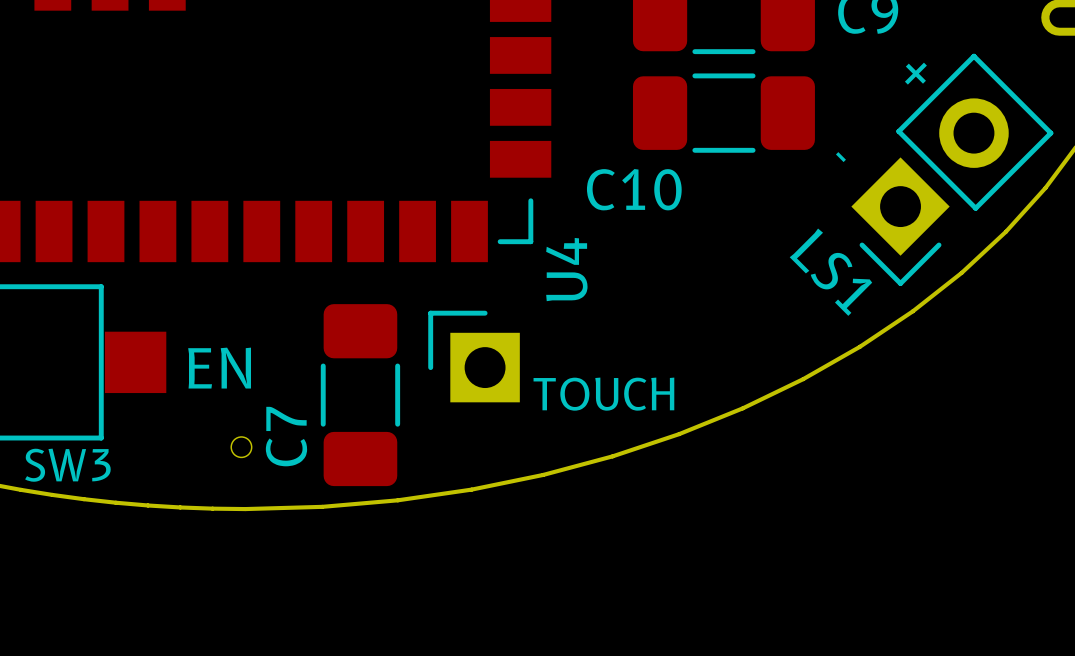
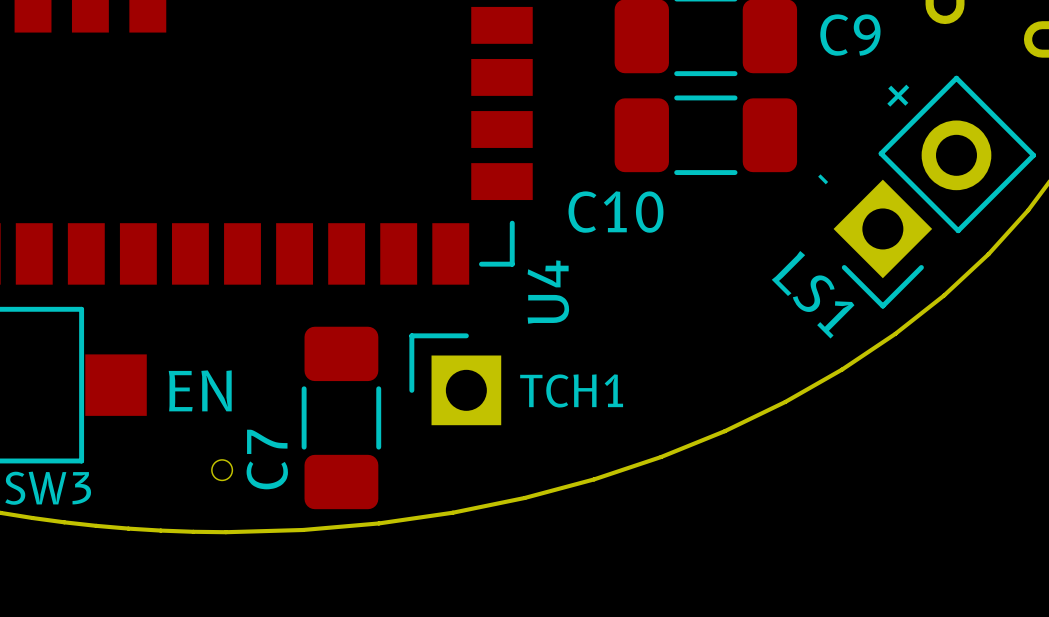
text: TOUCH (603, 394) -> TCH1 (571, 390)

